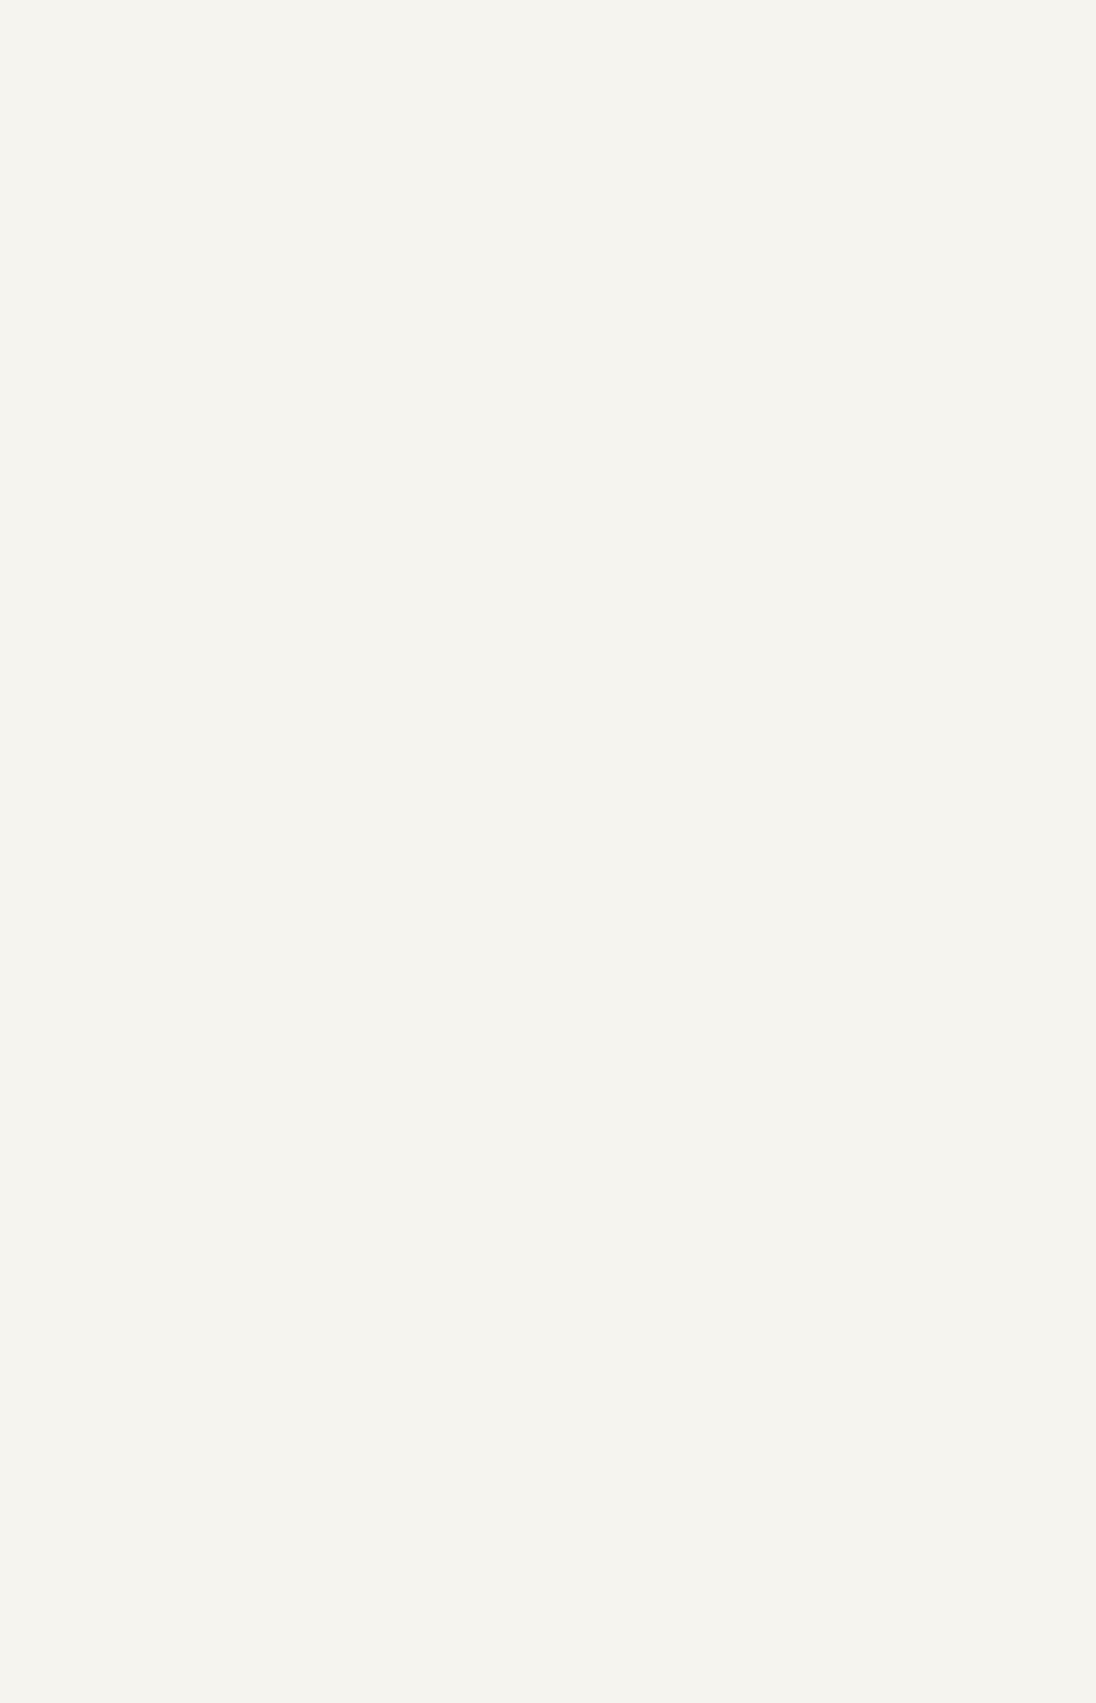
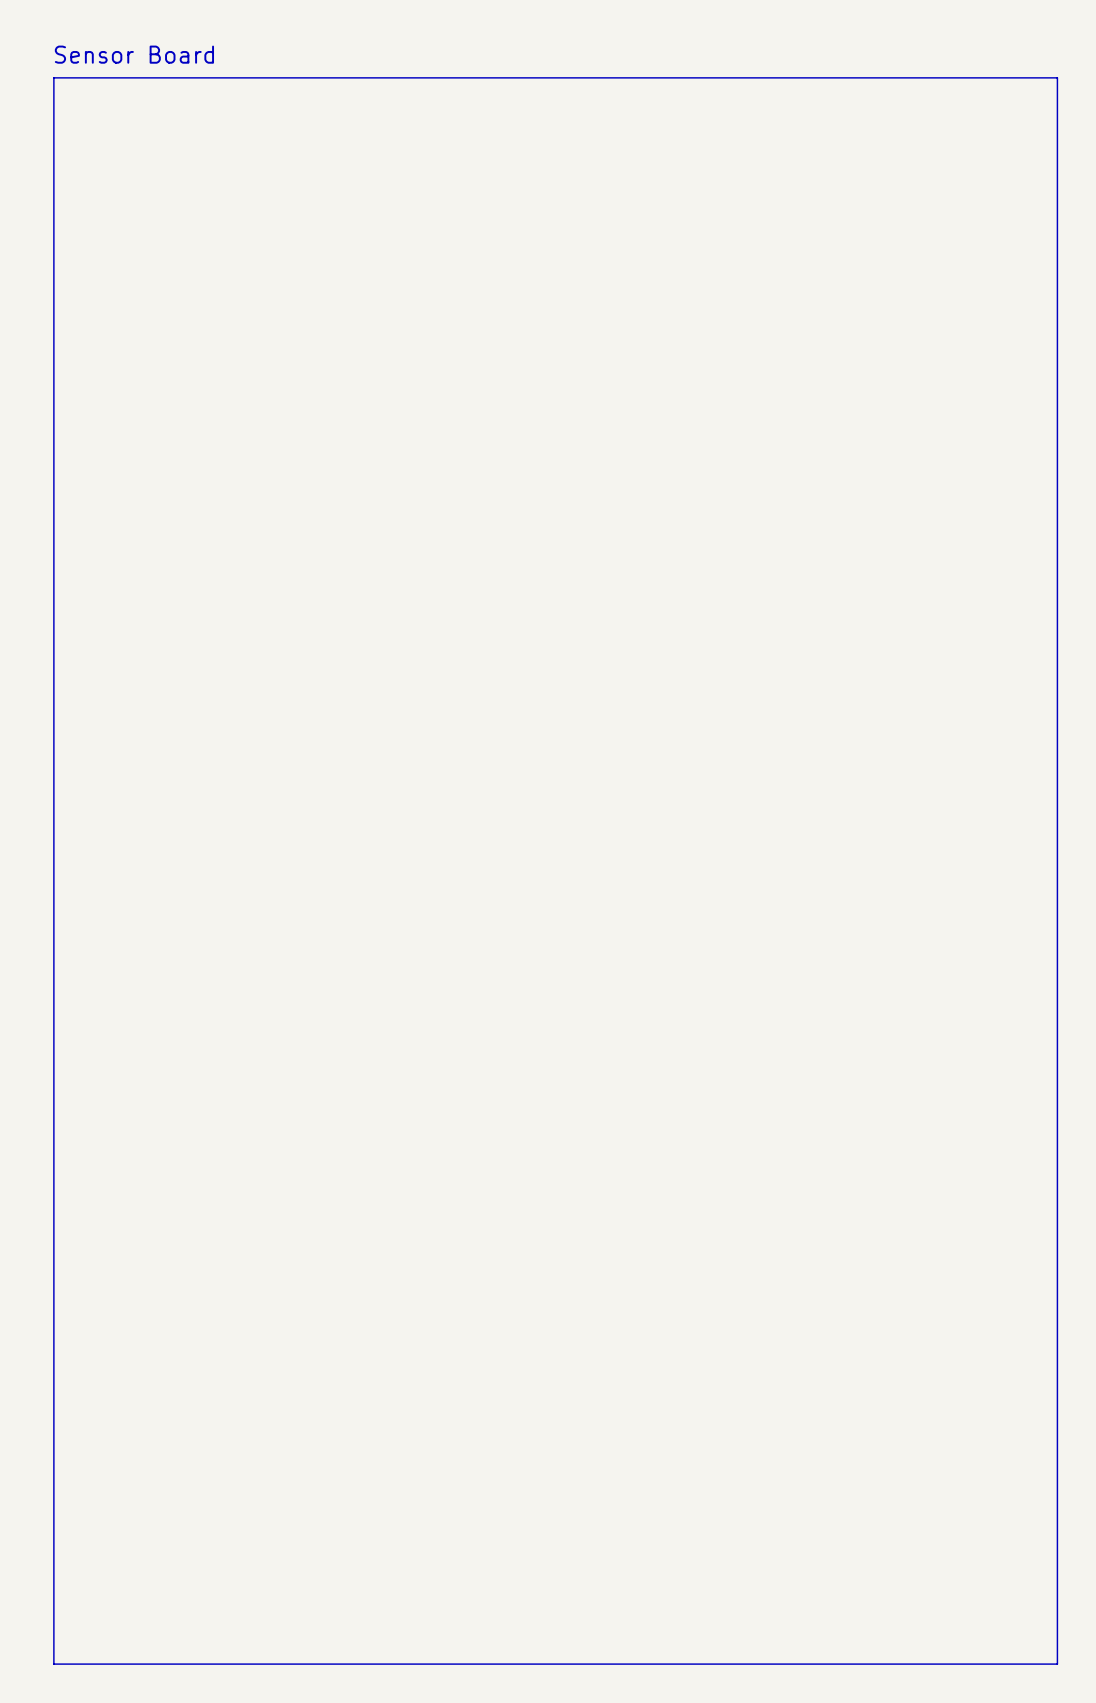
text: none -> Sensor Board (134, 54)
line: none -> (53, 77) (1057, 77) (1057, 1664) (53, 1664) (53, 77)

